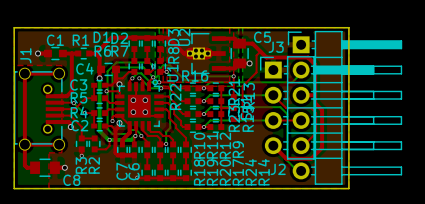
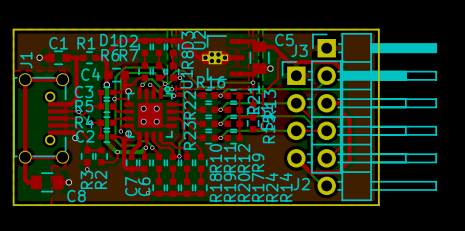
R23 name position: R23 (234, 118) -> R23 (189, 135)

